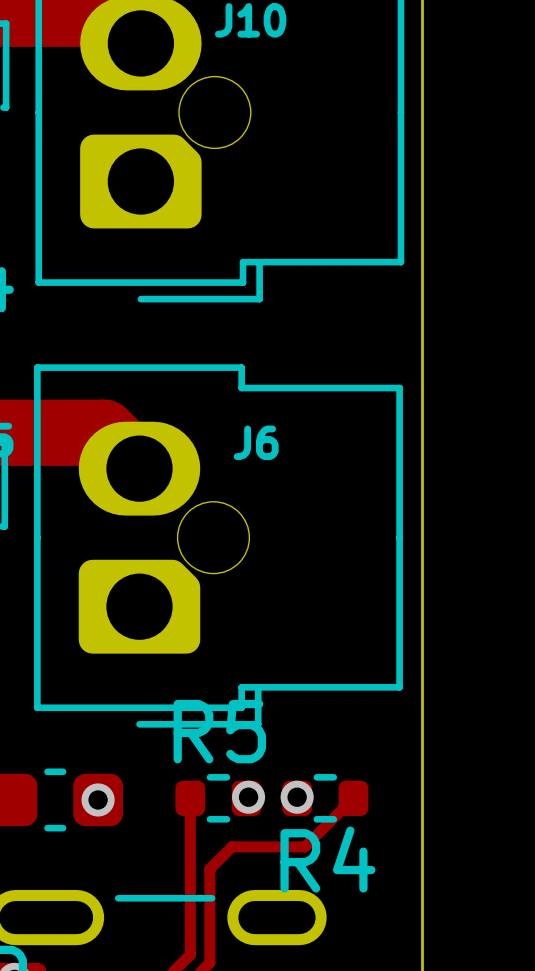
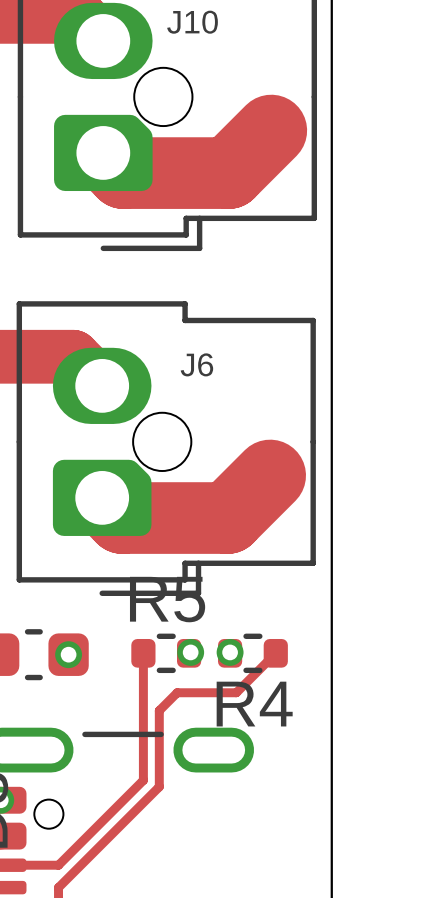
top track: none -> (271, 130) (228, 173) (123, 173) (103, 152)
top track: none -> (270, 475) (227, 518) (122, 518) (102, 497)

